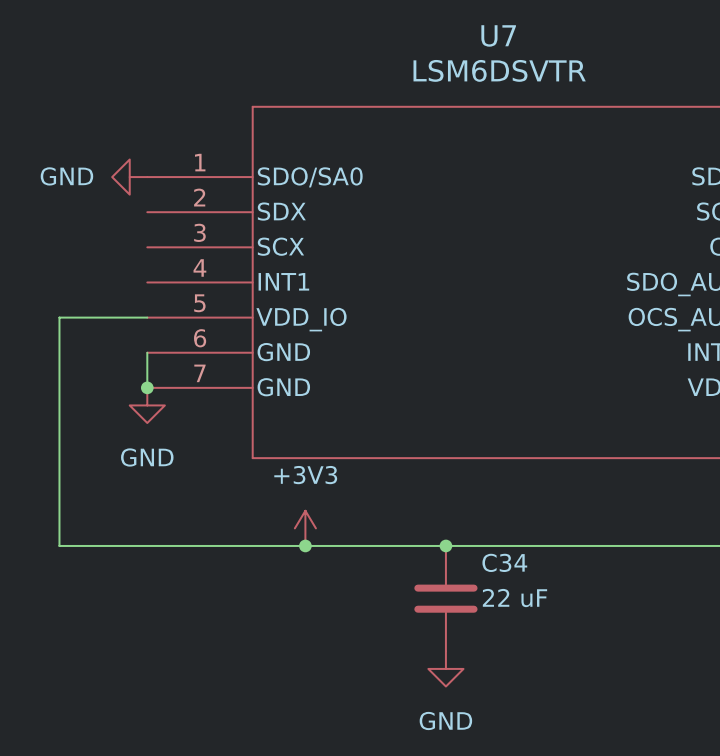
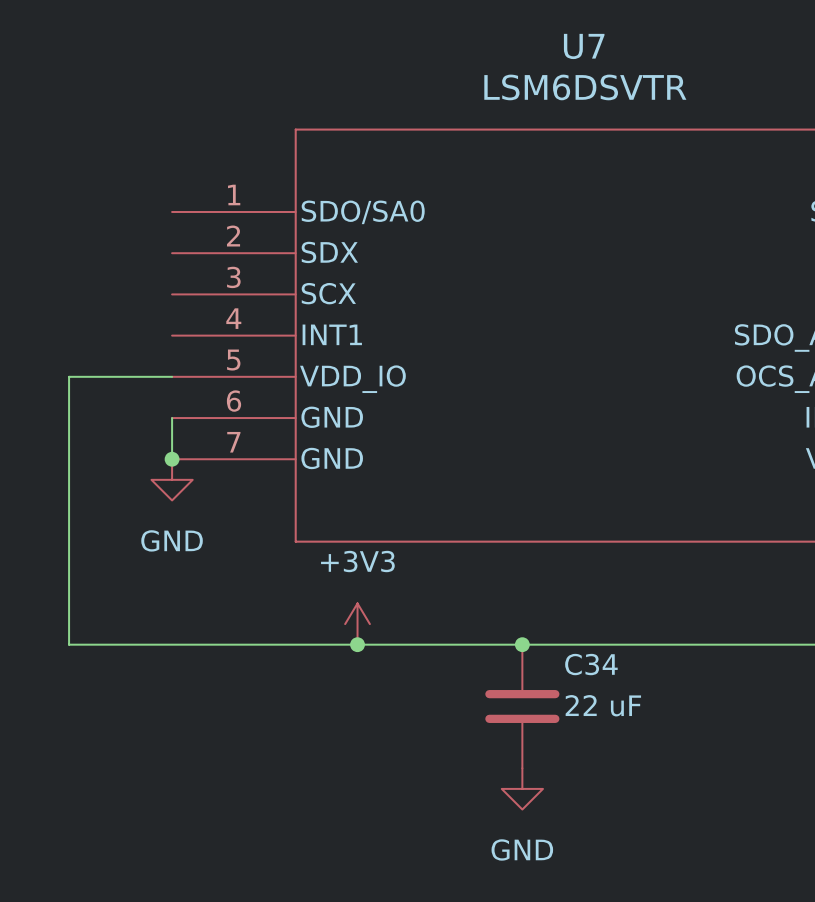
power symbol: GND (129, 177) -> none

